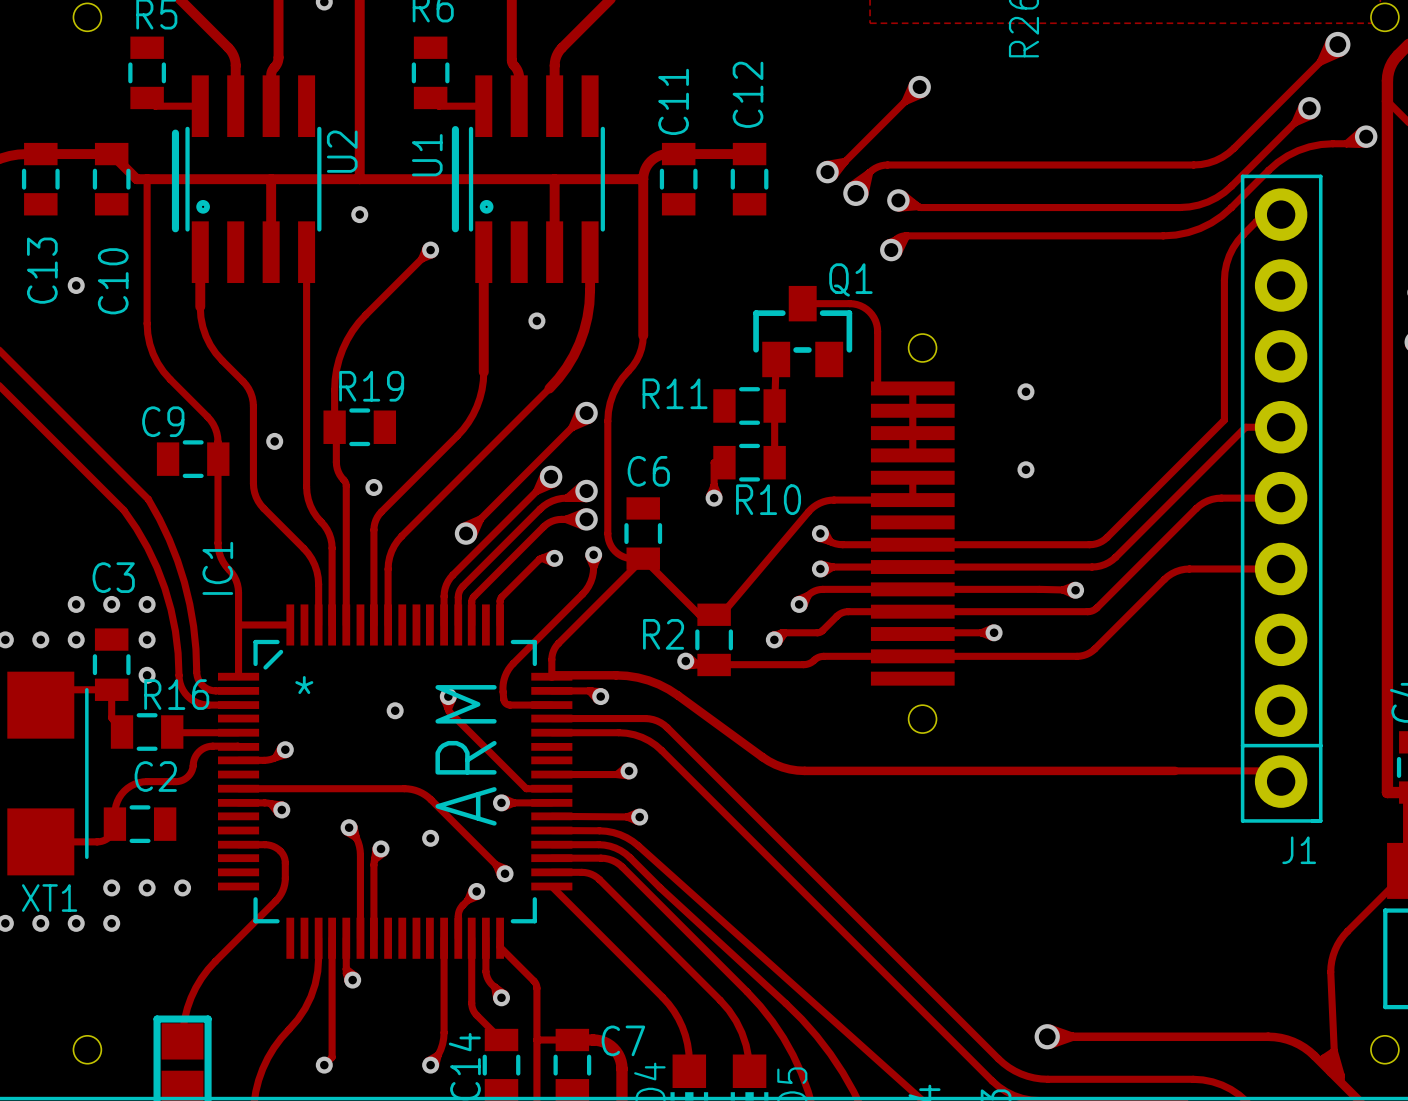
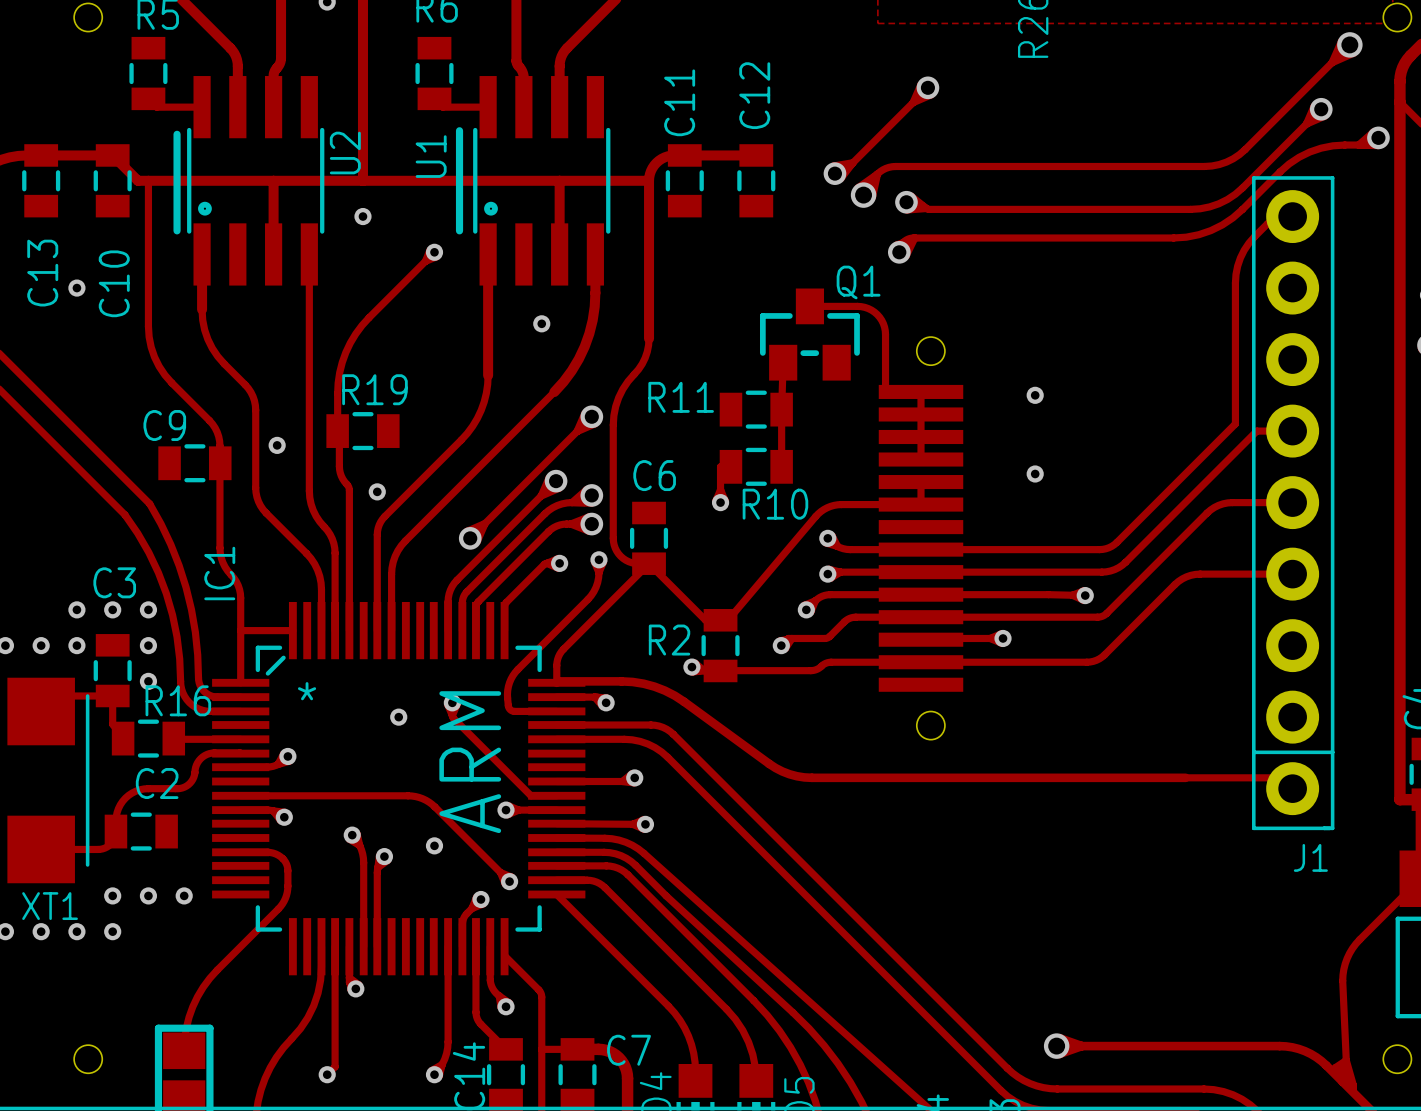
IC1 footprint: [217, 604, 573, 959] -> [212, 602, 586, 976]

